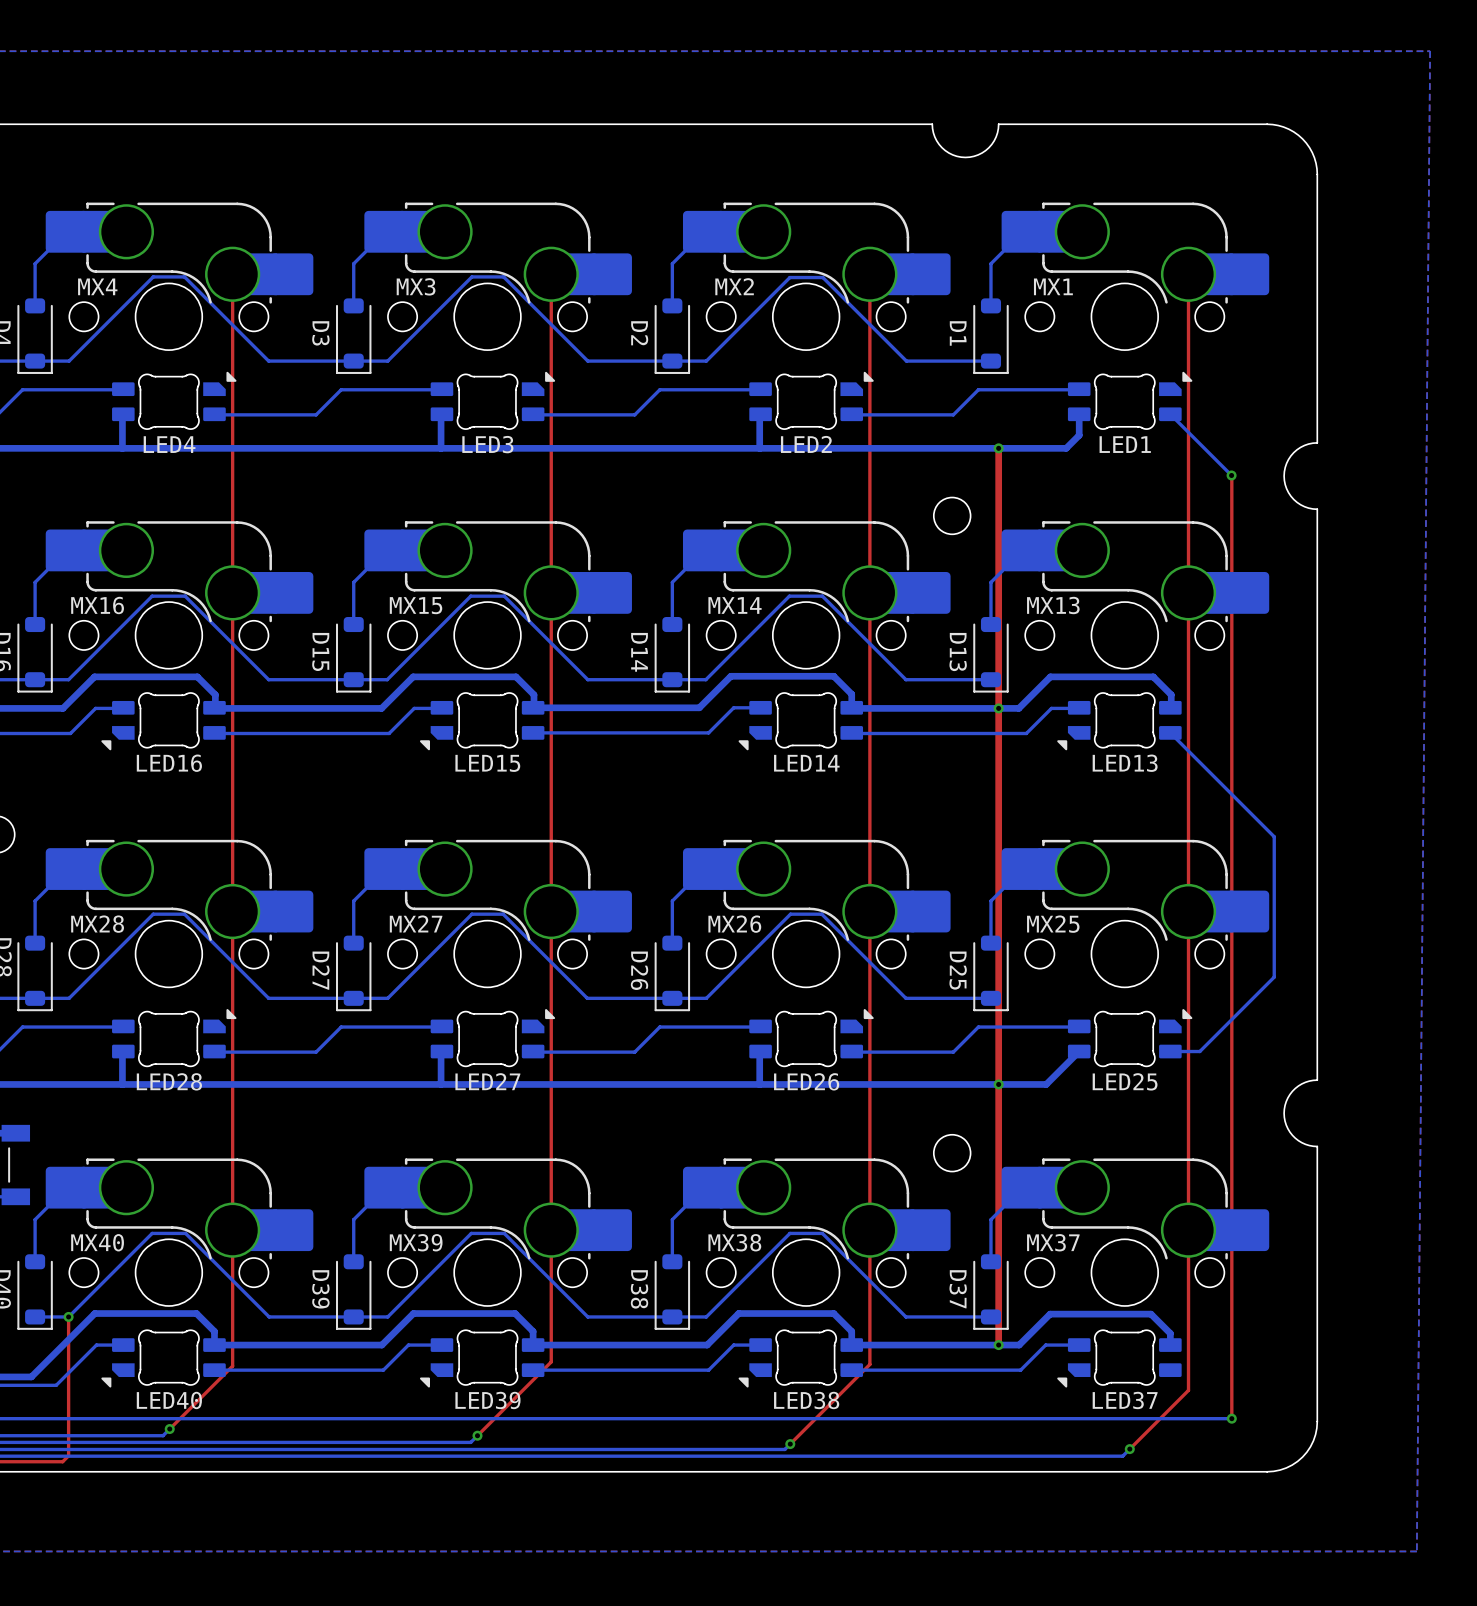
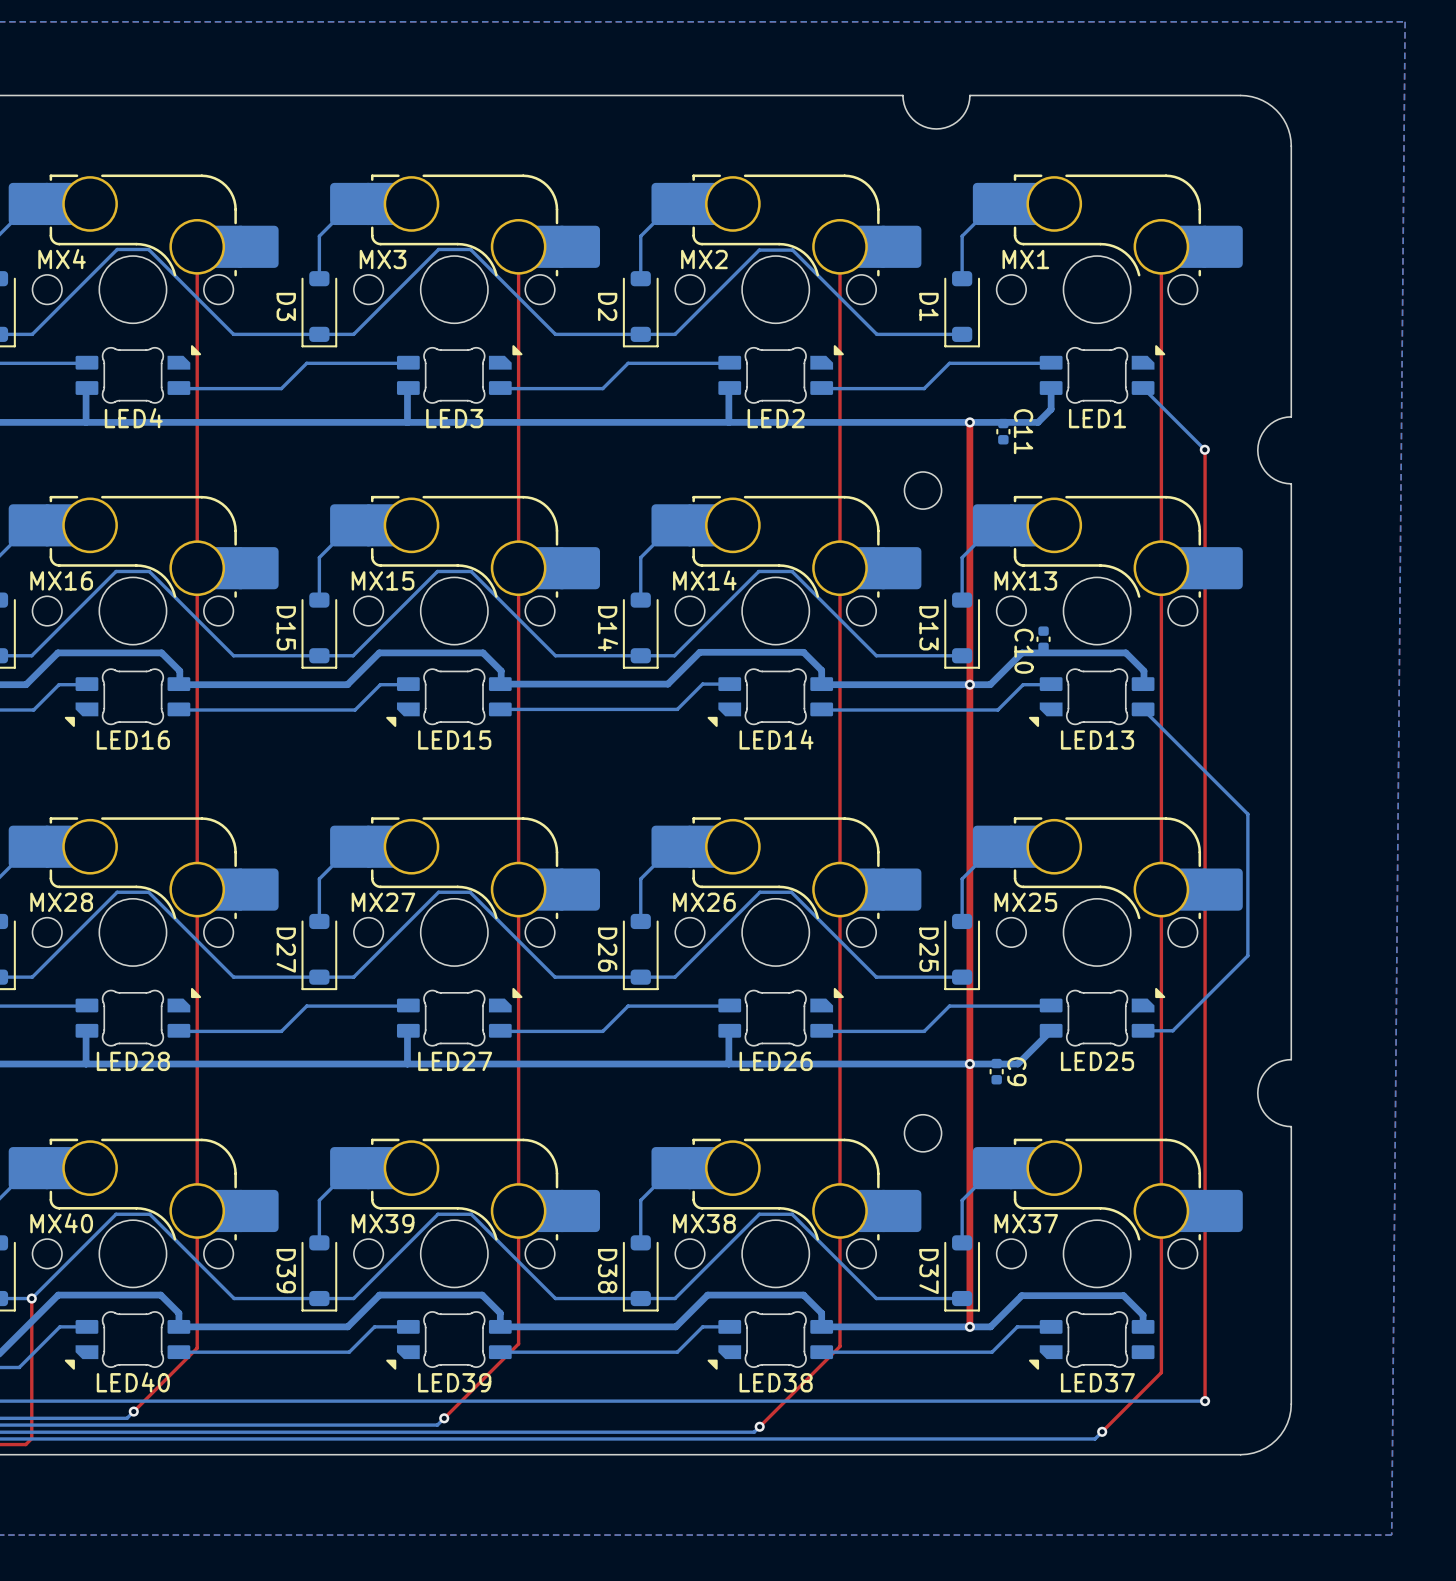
C11: none -> (1003, 431)
C10: none -> (1043, 639)
C9: none -> (996, 1071)

